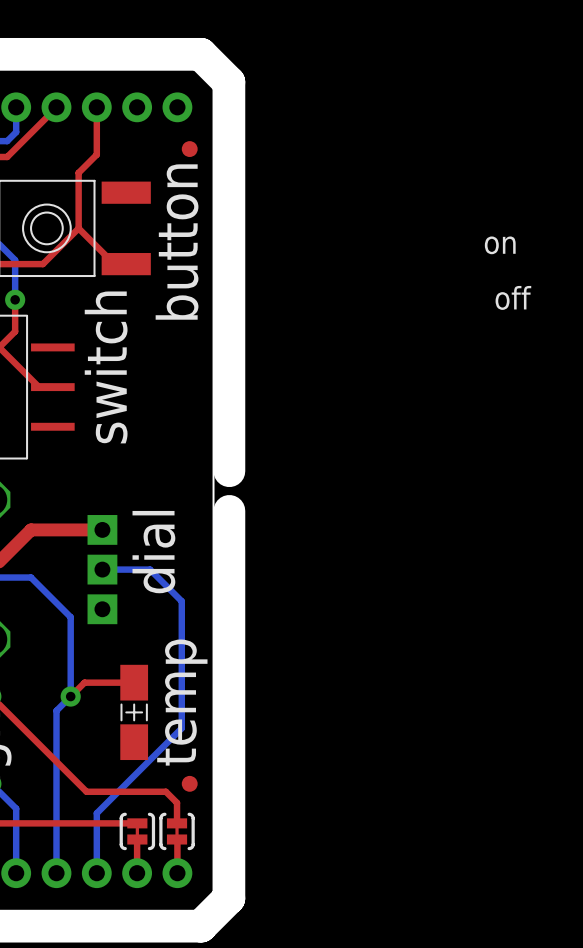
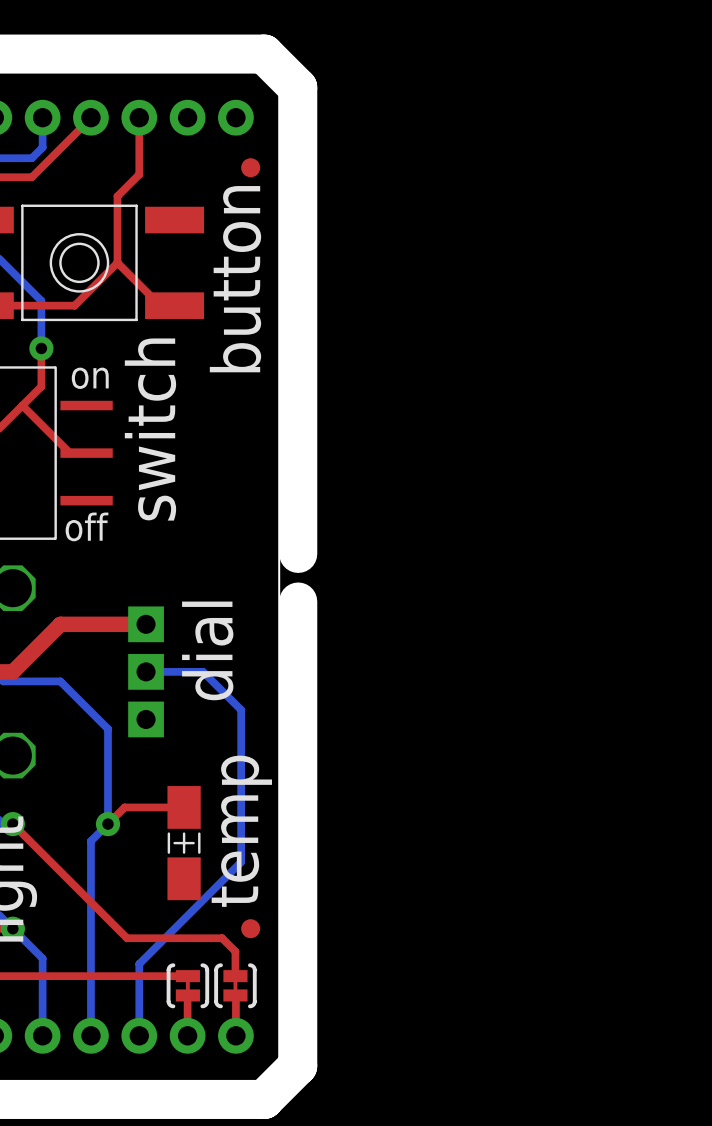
text: on (500, 245) -> none
text: off (513, 297) -> none
text: none -> on (90, 378)
text: none -> off (86, 526)

